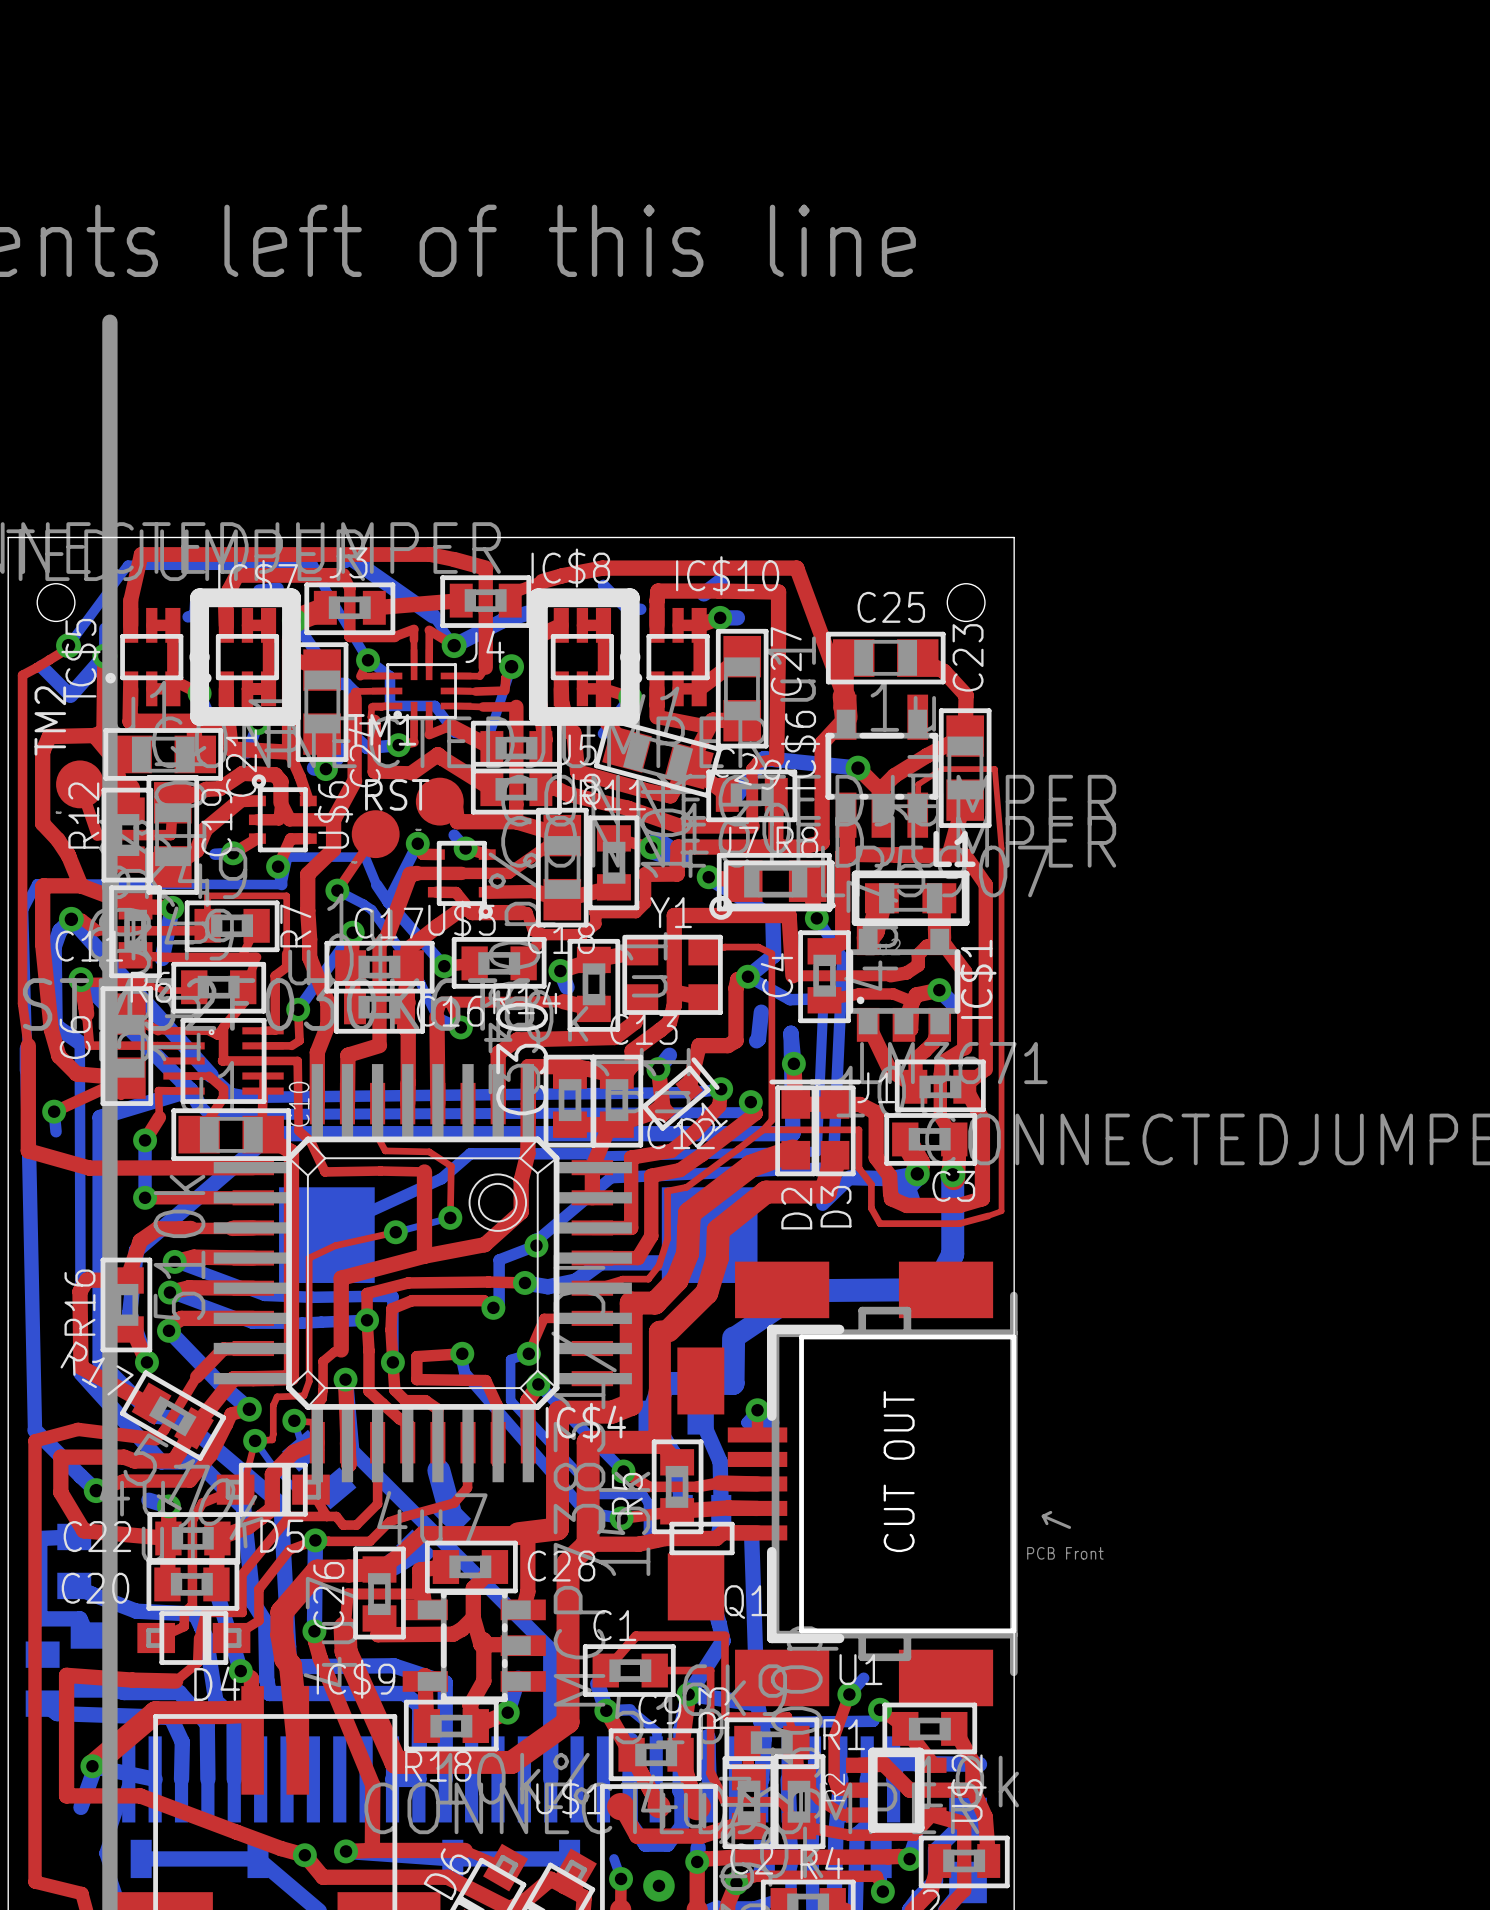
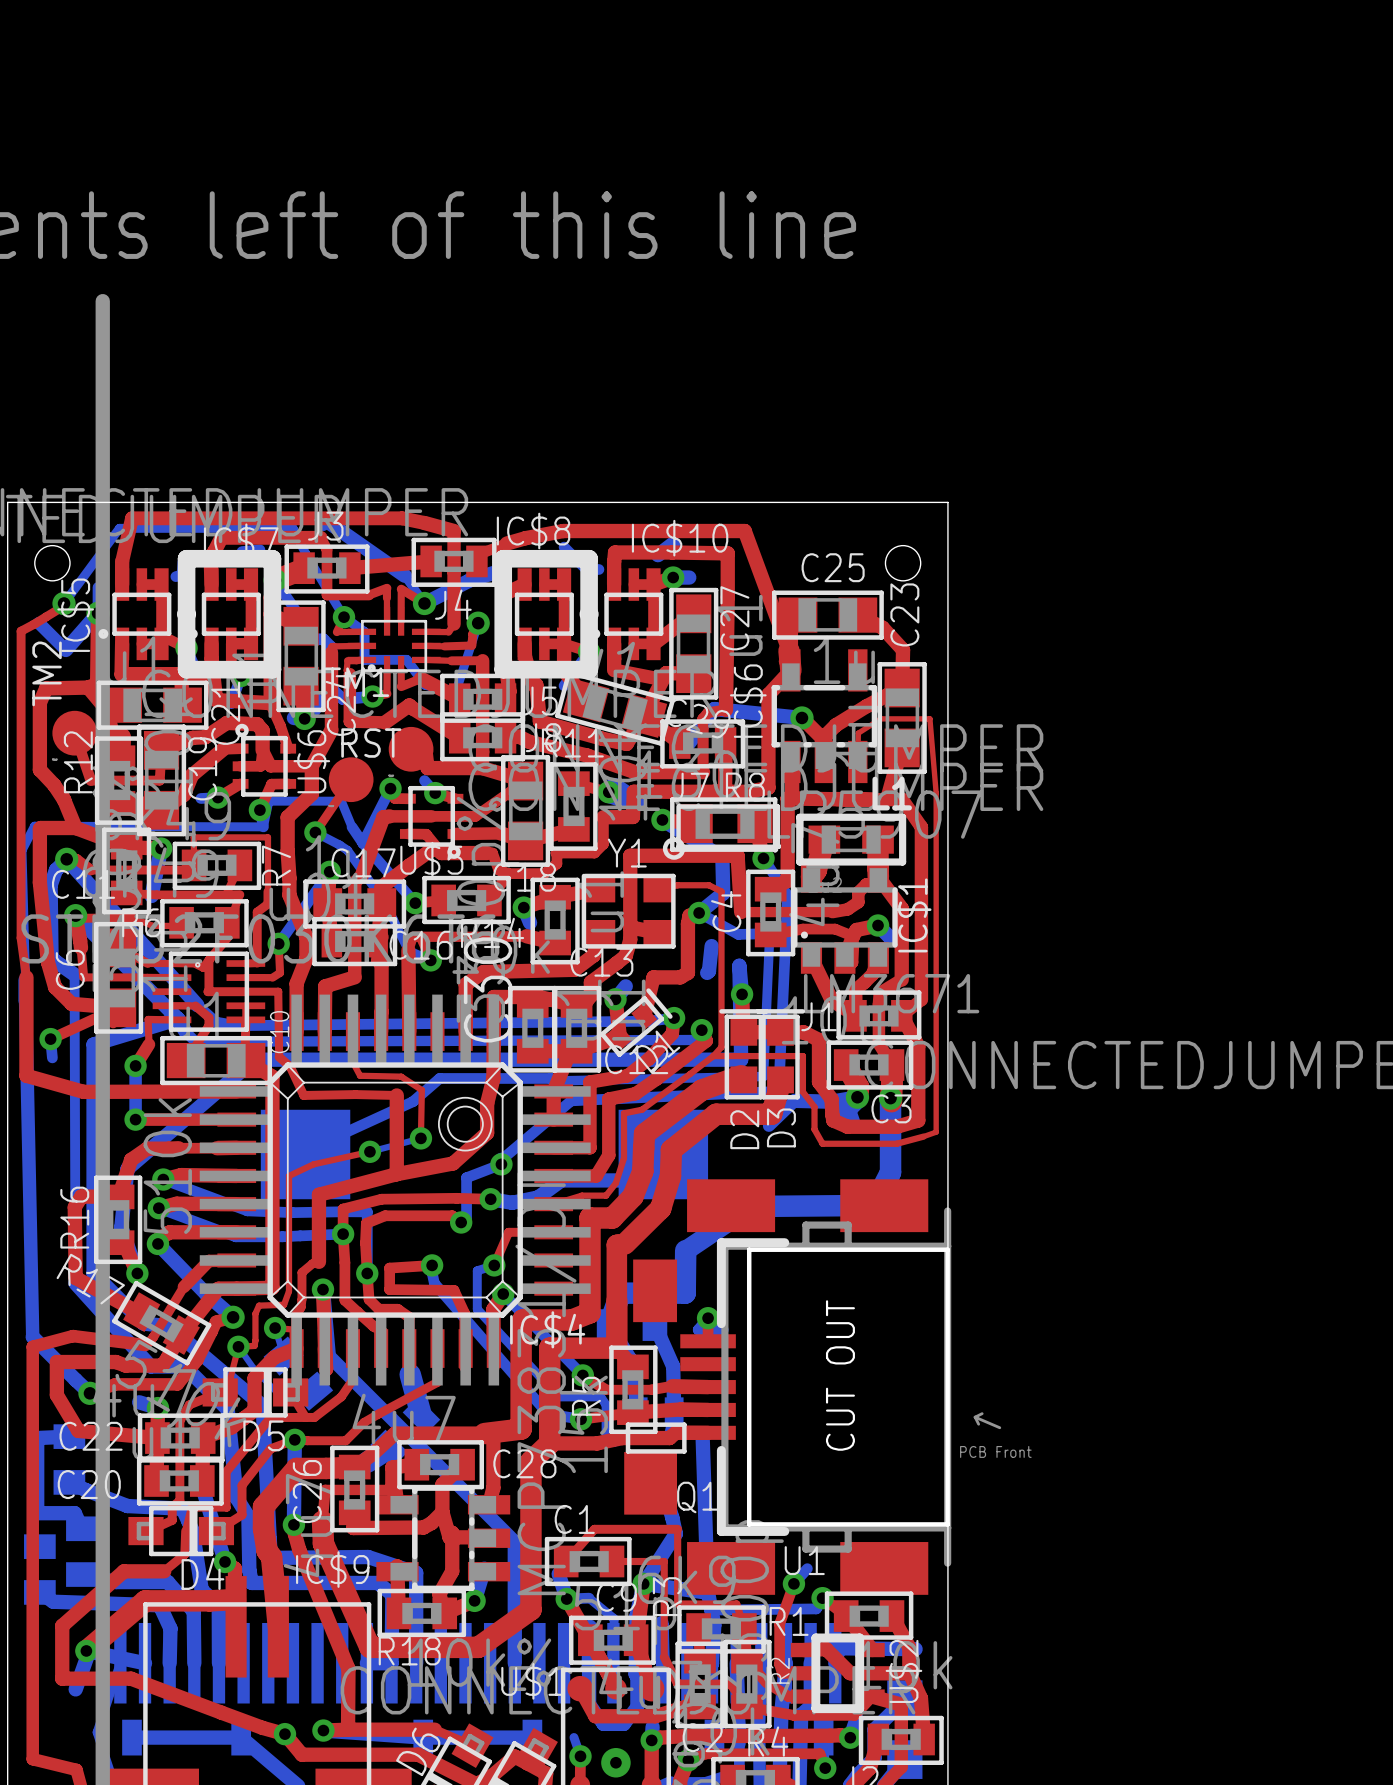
top track: (468, 1442) (467, 1487) (454, 1503) (389, 1521) -> (437, 1348) (437, 1382) (364, 1422)
top track: (377, 1460) (377, 1504) (356, 1525) (343, 1525) (336, 1516) -> (352, 1364) (352, 1379) (341, 1396) (314, 1417)
top track: (175, 1681) (66, 1675) (66, 1739) -> (164, 1571) (123, 1571) (62, 1625)

